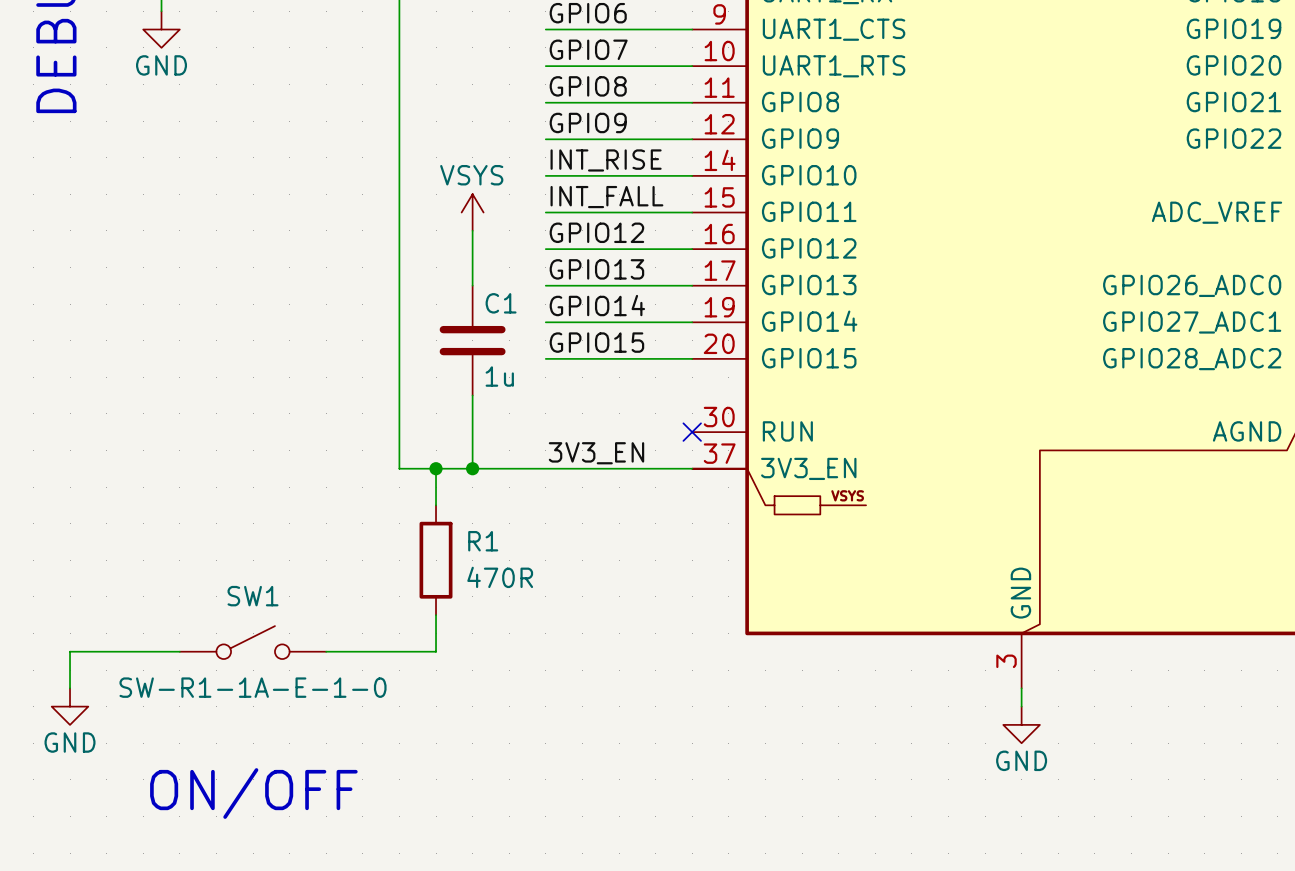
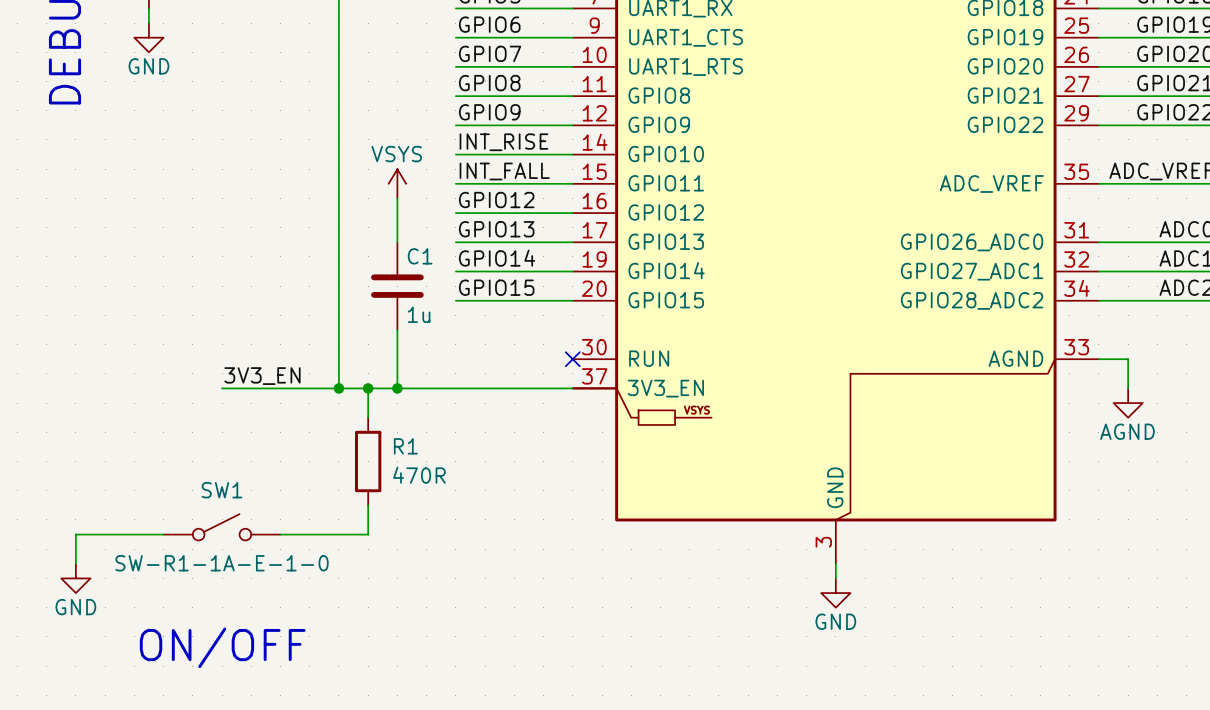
label position: 3V3_EN (596, 453) -> 3V3_EN (262, 376)
wire: none -> (222, 388) (338, 388)
junction: none -> (338, 388)

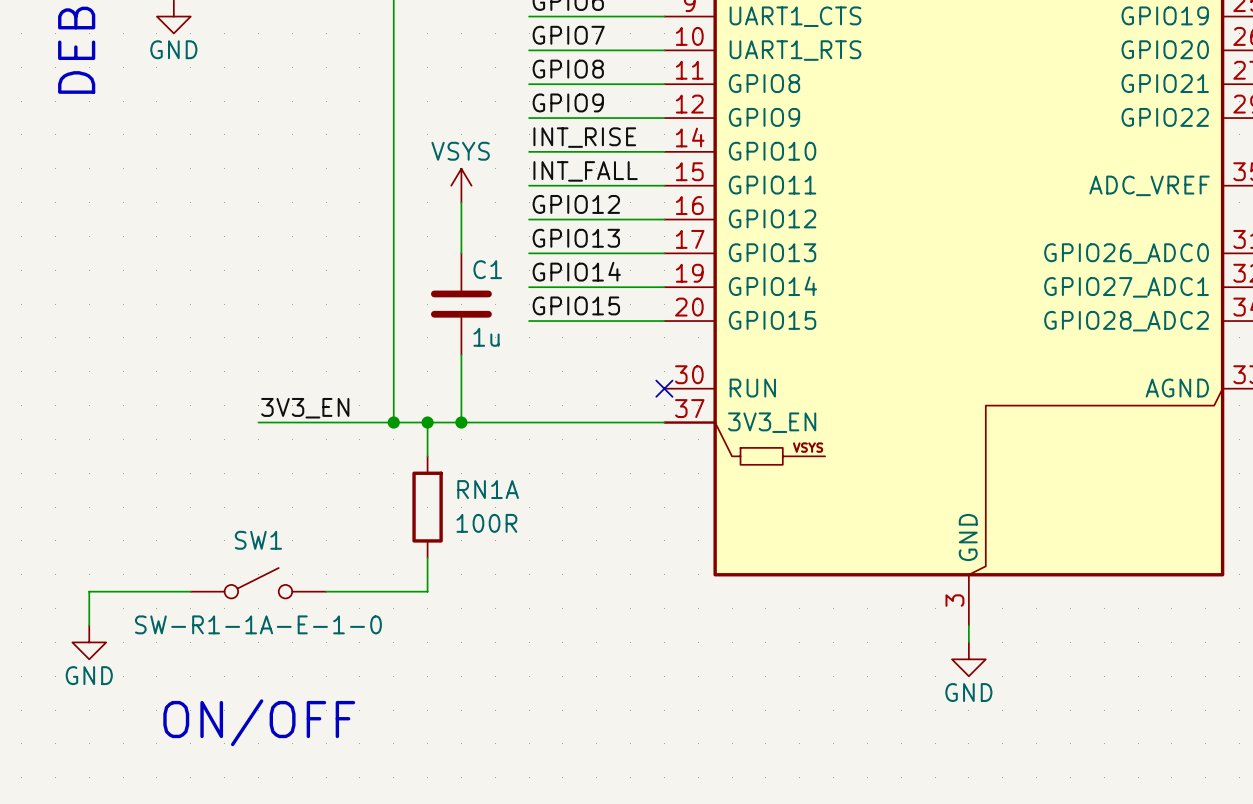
R1 name: R1 (405, 446) -> RN1A (488, 489)
R1 value: 470R (419, 475) -> 100R (486, 523)

